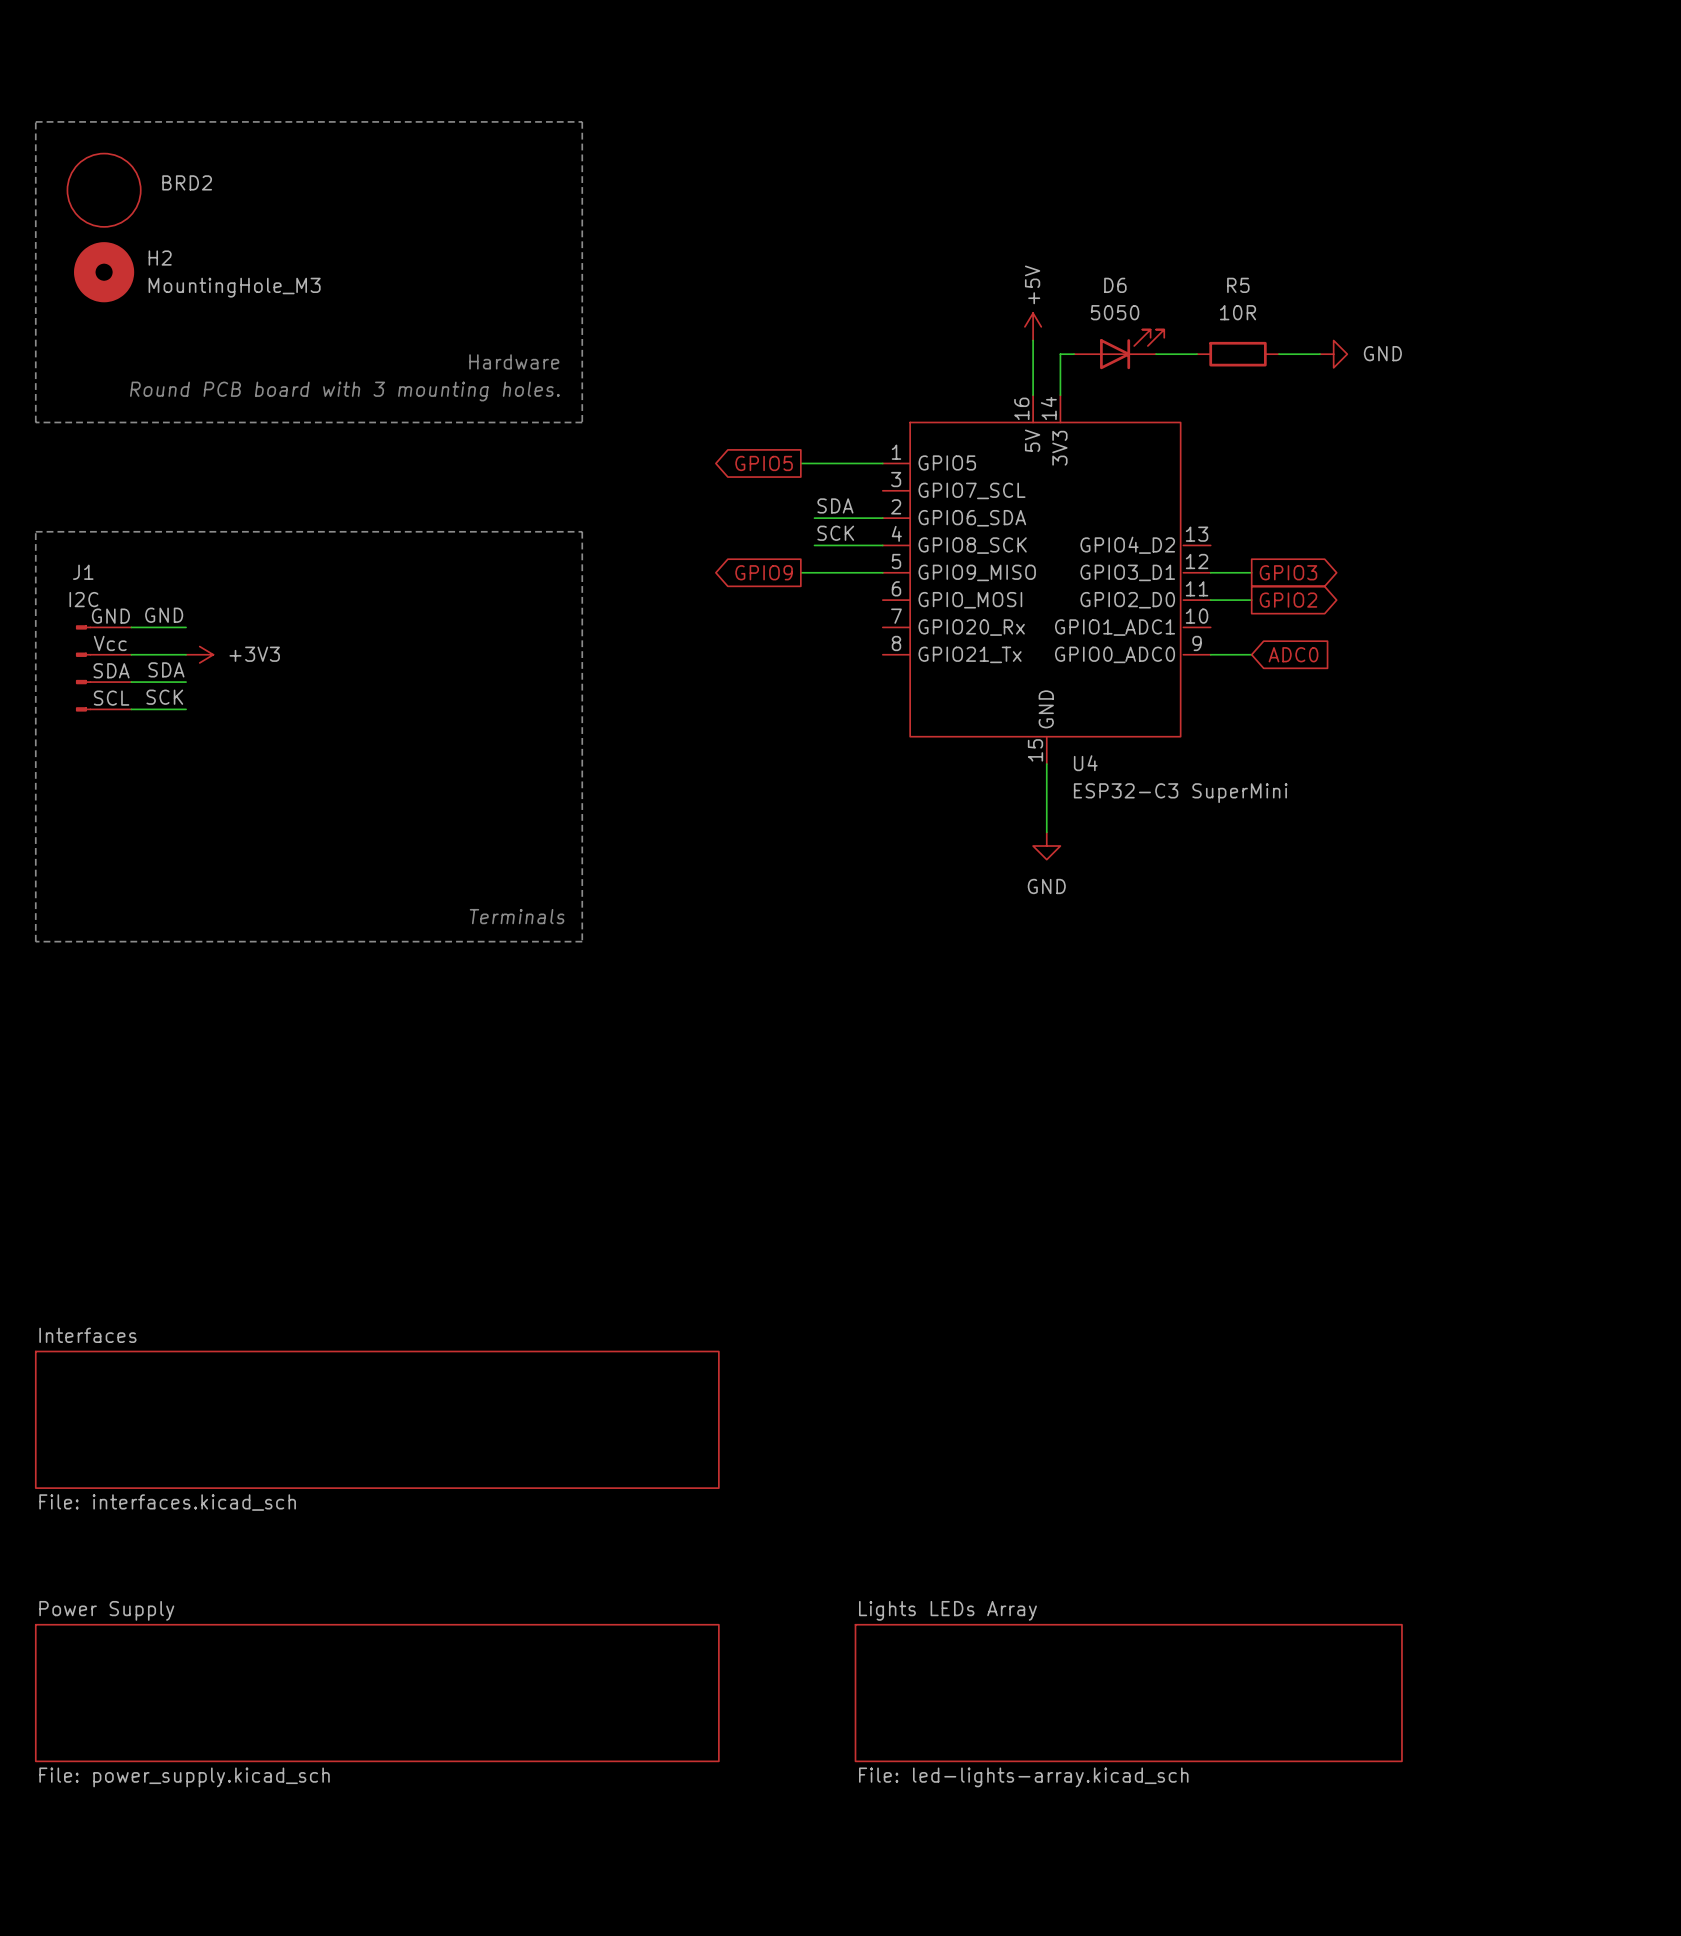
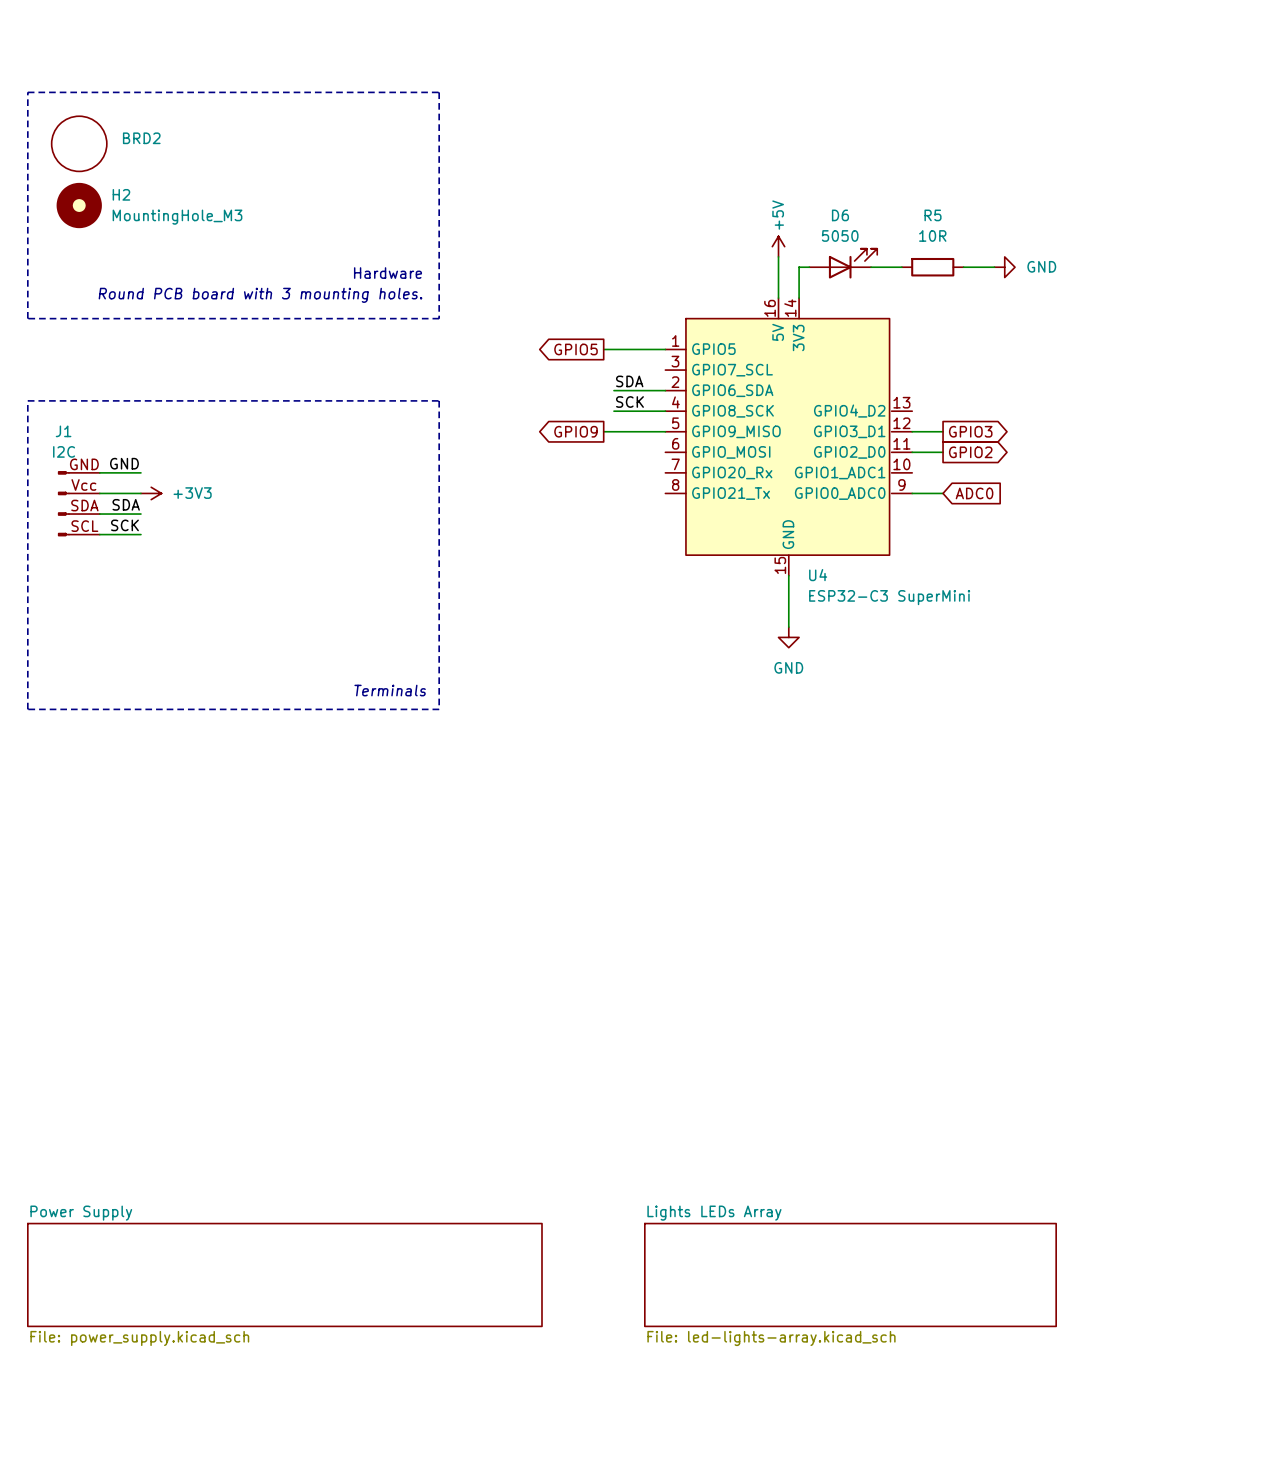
sheet Interfaces: File: interfaces.kicad_sch (377, 1419) -> none

